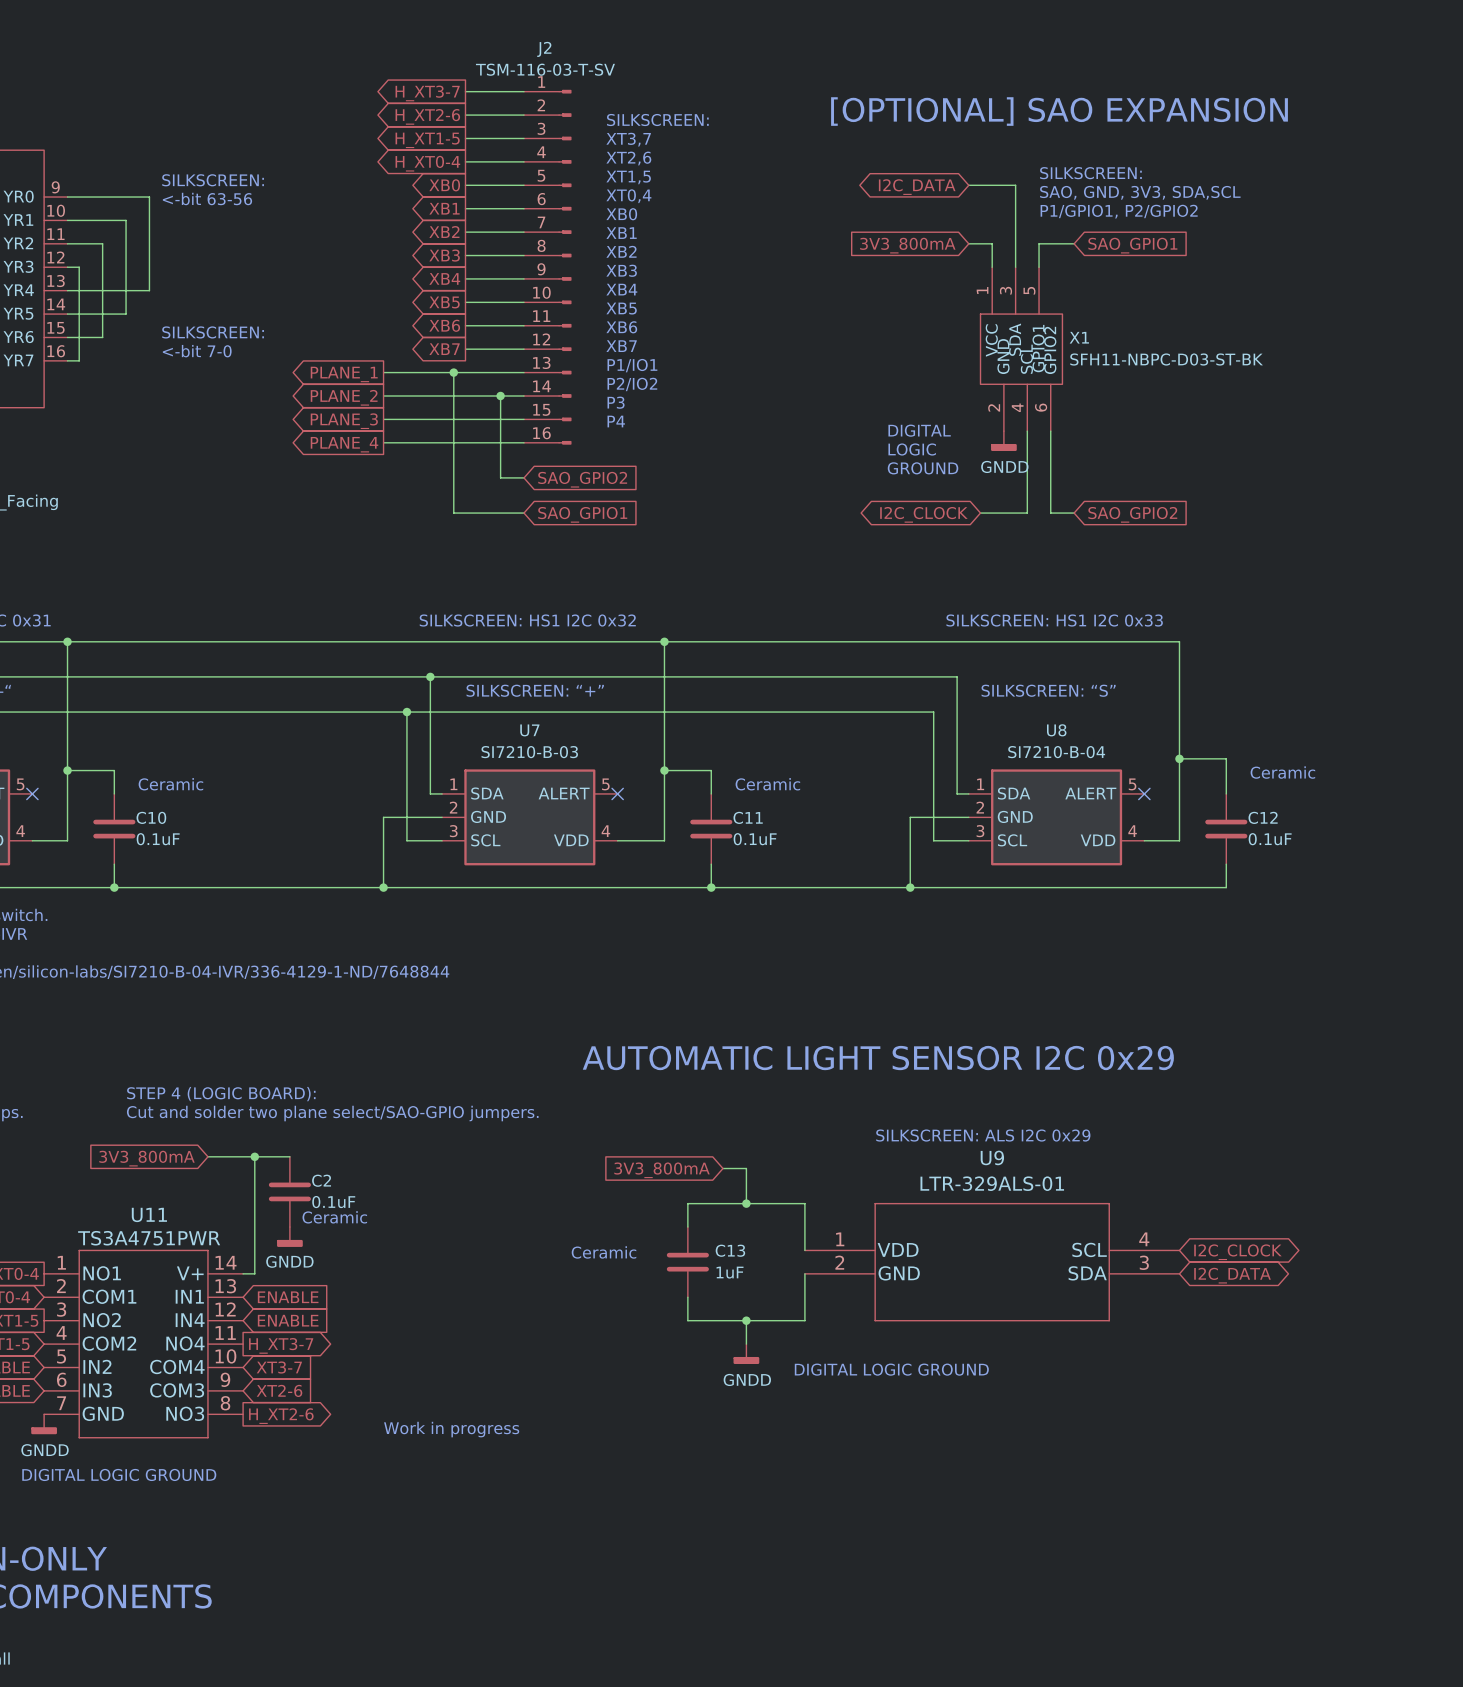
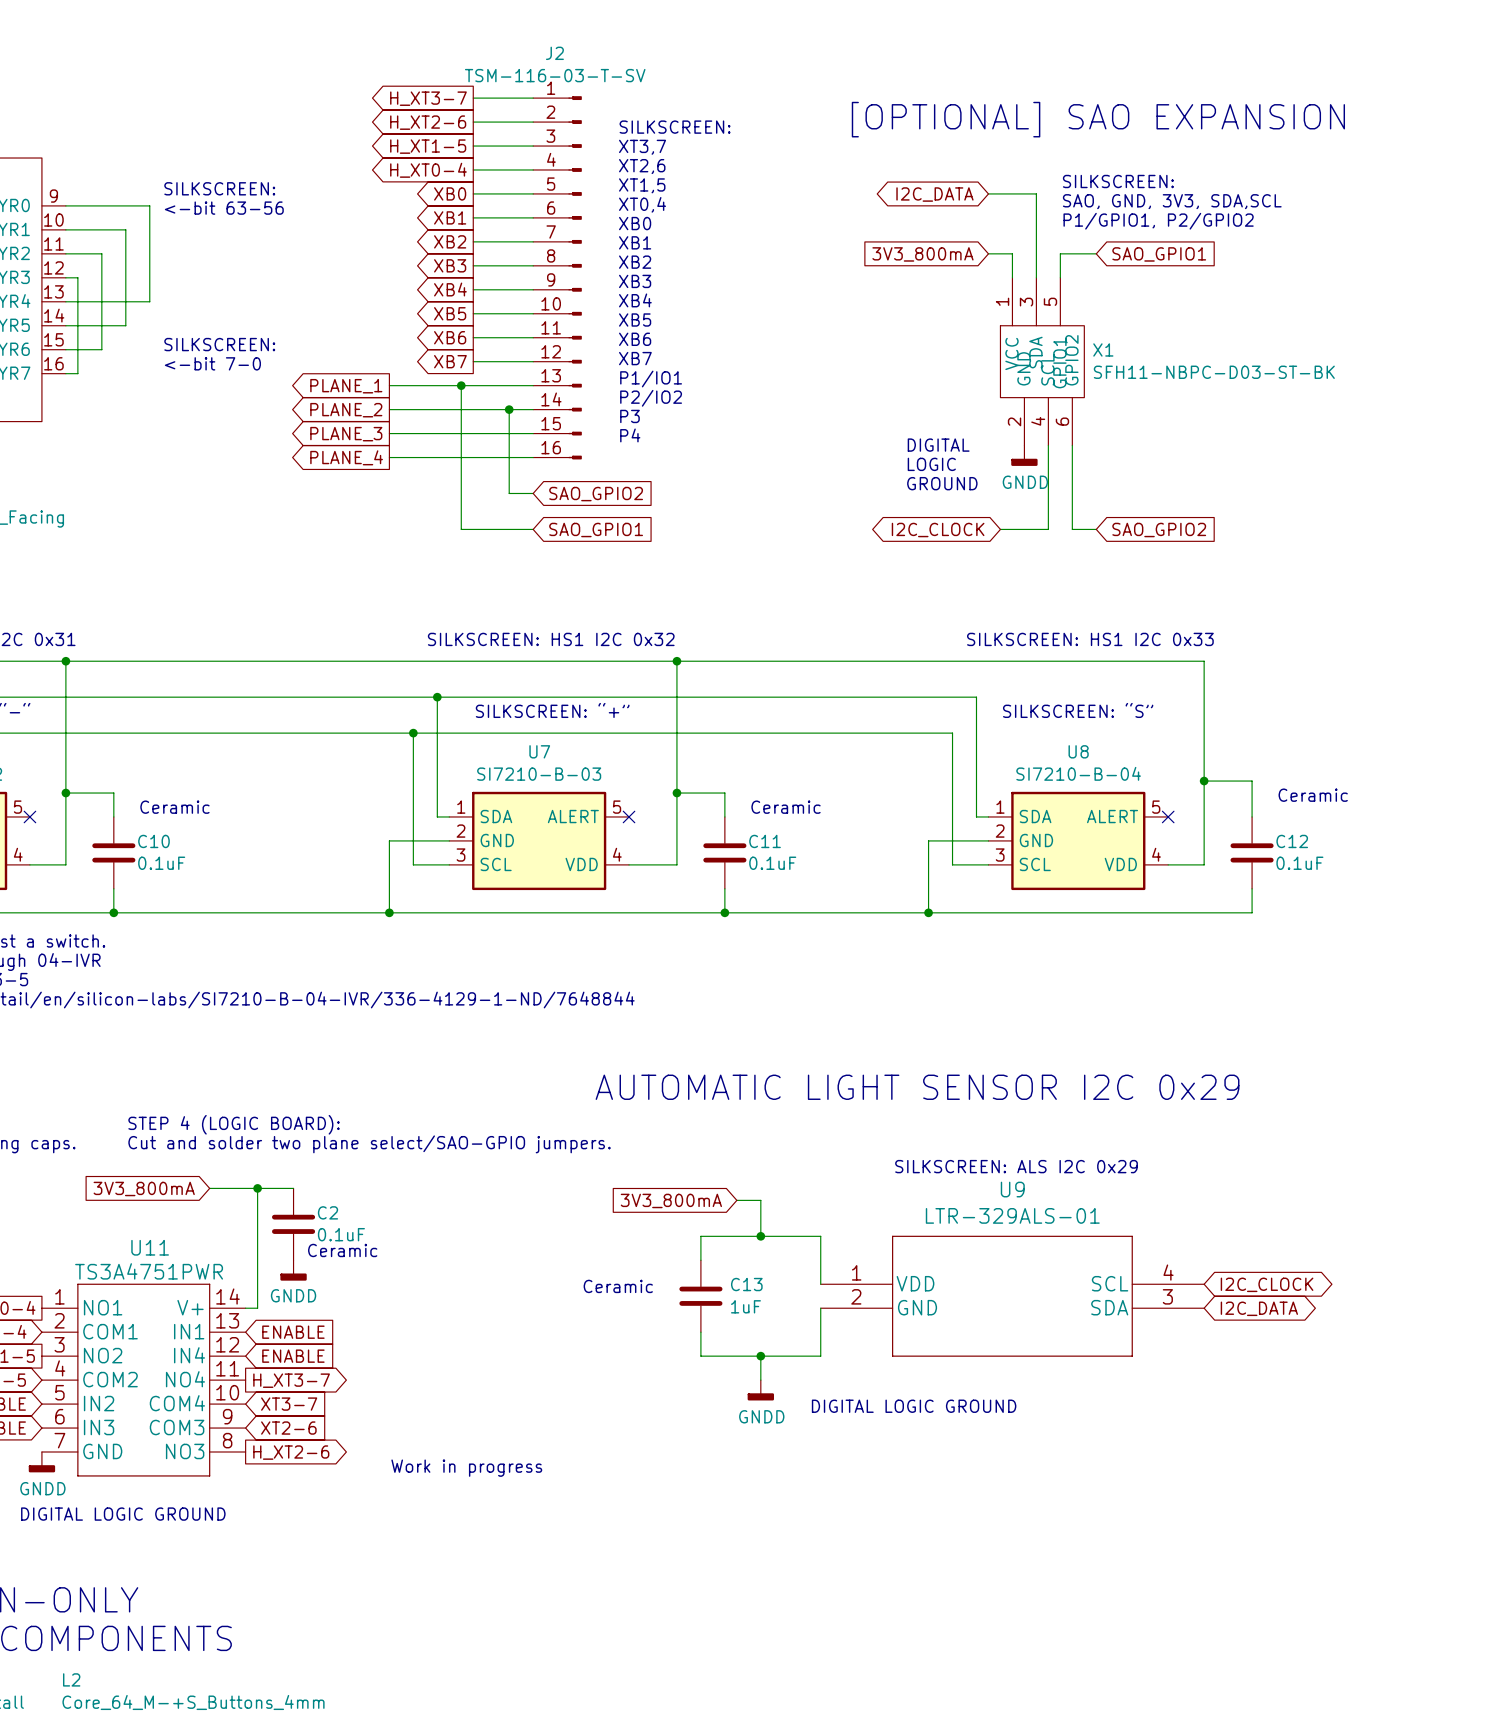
L2: none -> Core_64_M-+S_Buttons_4mm (193, 1691)

